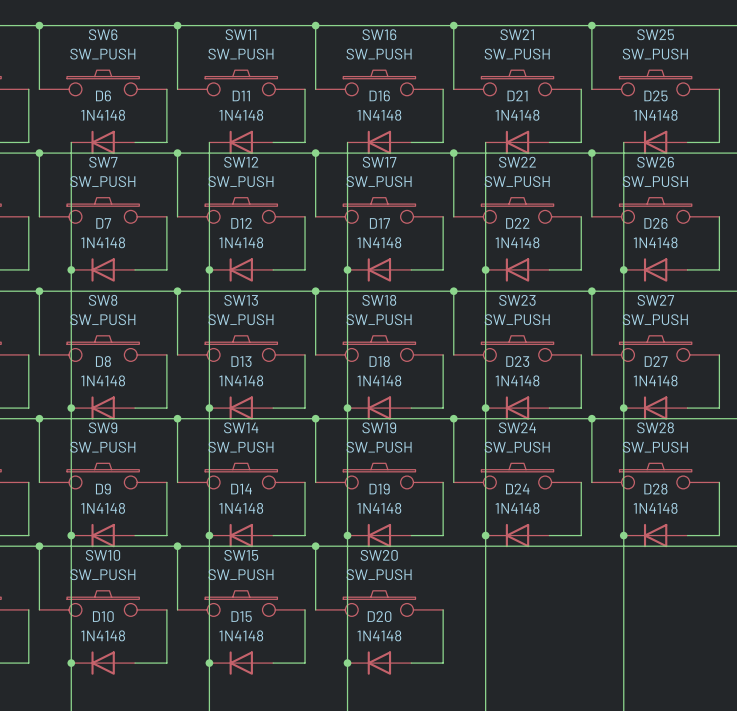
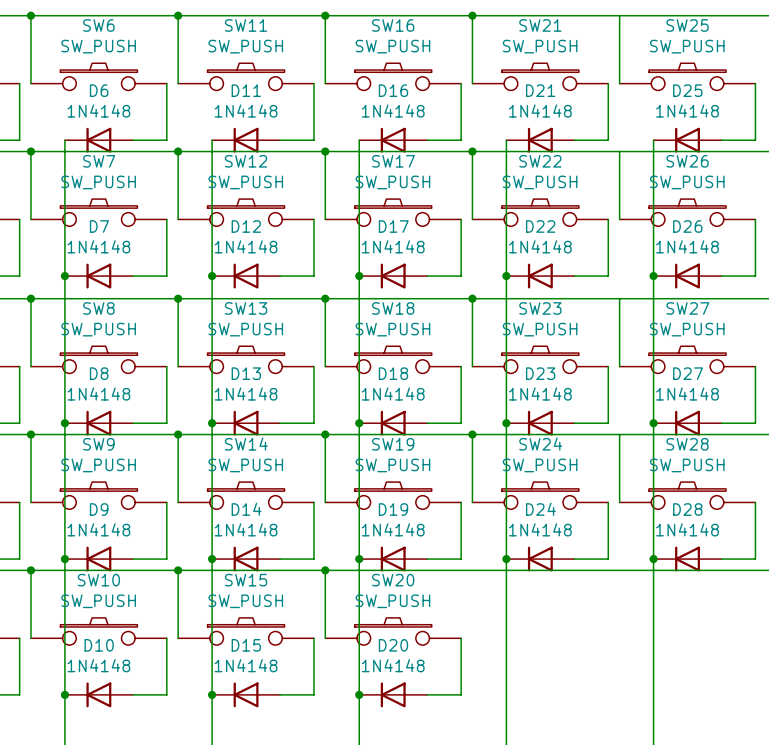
junction: (591, 25) -> none
junction: (591, 153) -> none
junction: (591, 291) -> none
junction: (591, 418) -> none

